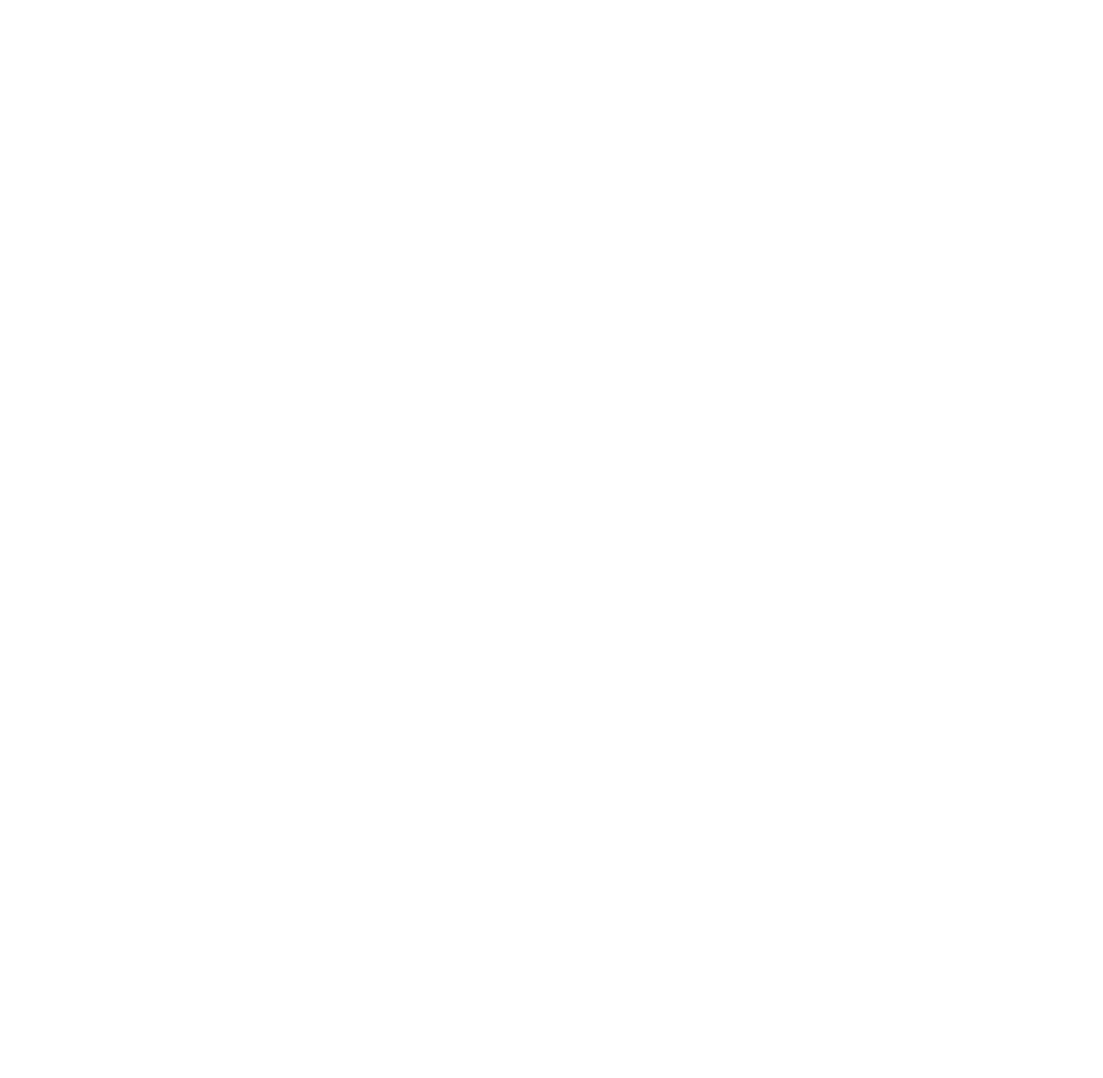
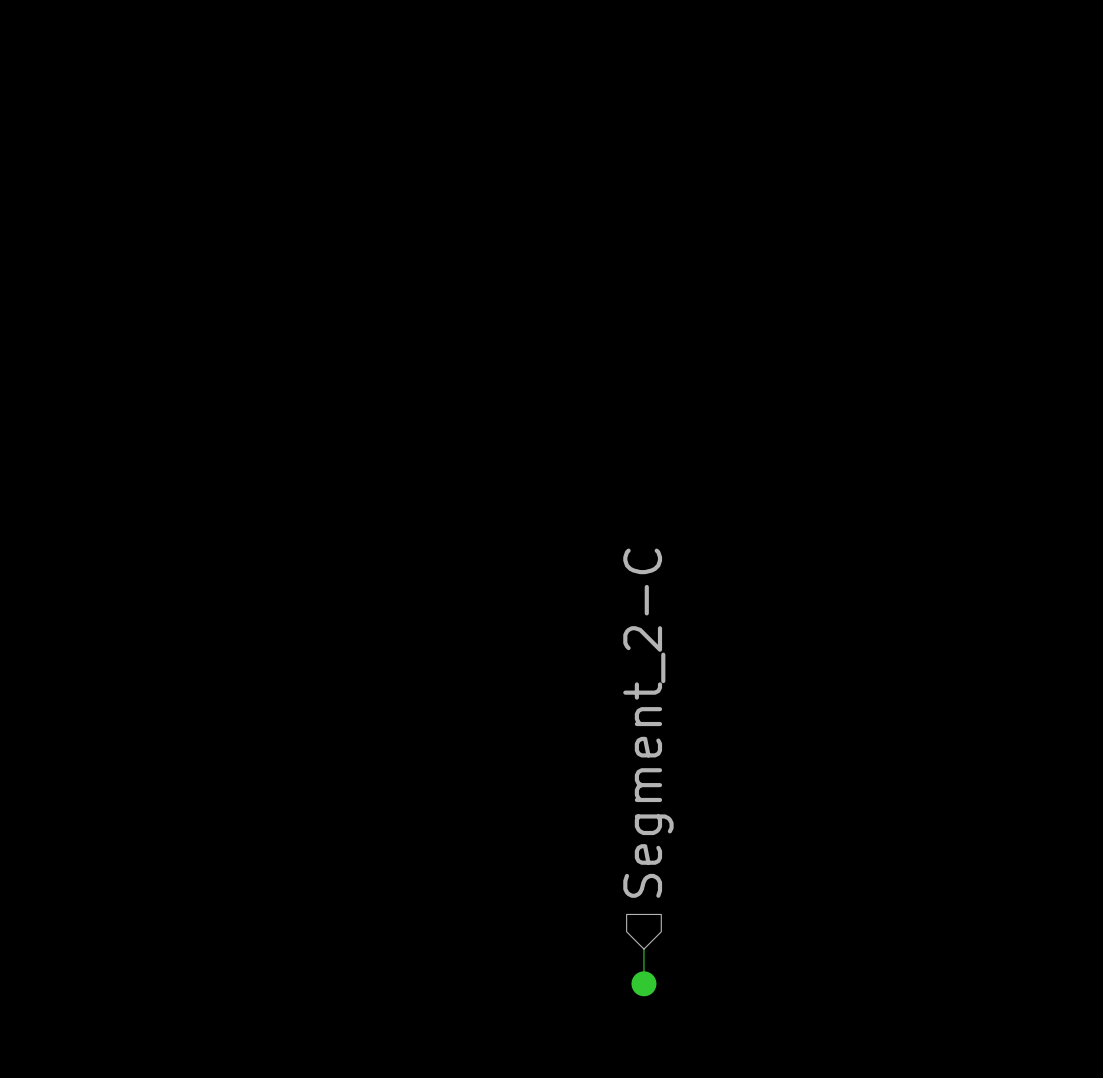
hierarchical label: none -> Segment_2-C (648, 723)
wire: none -> (643, 949) (643, 983)
junction: none -> (643, 983)

